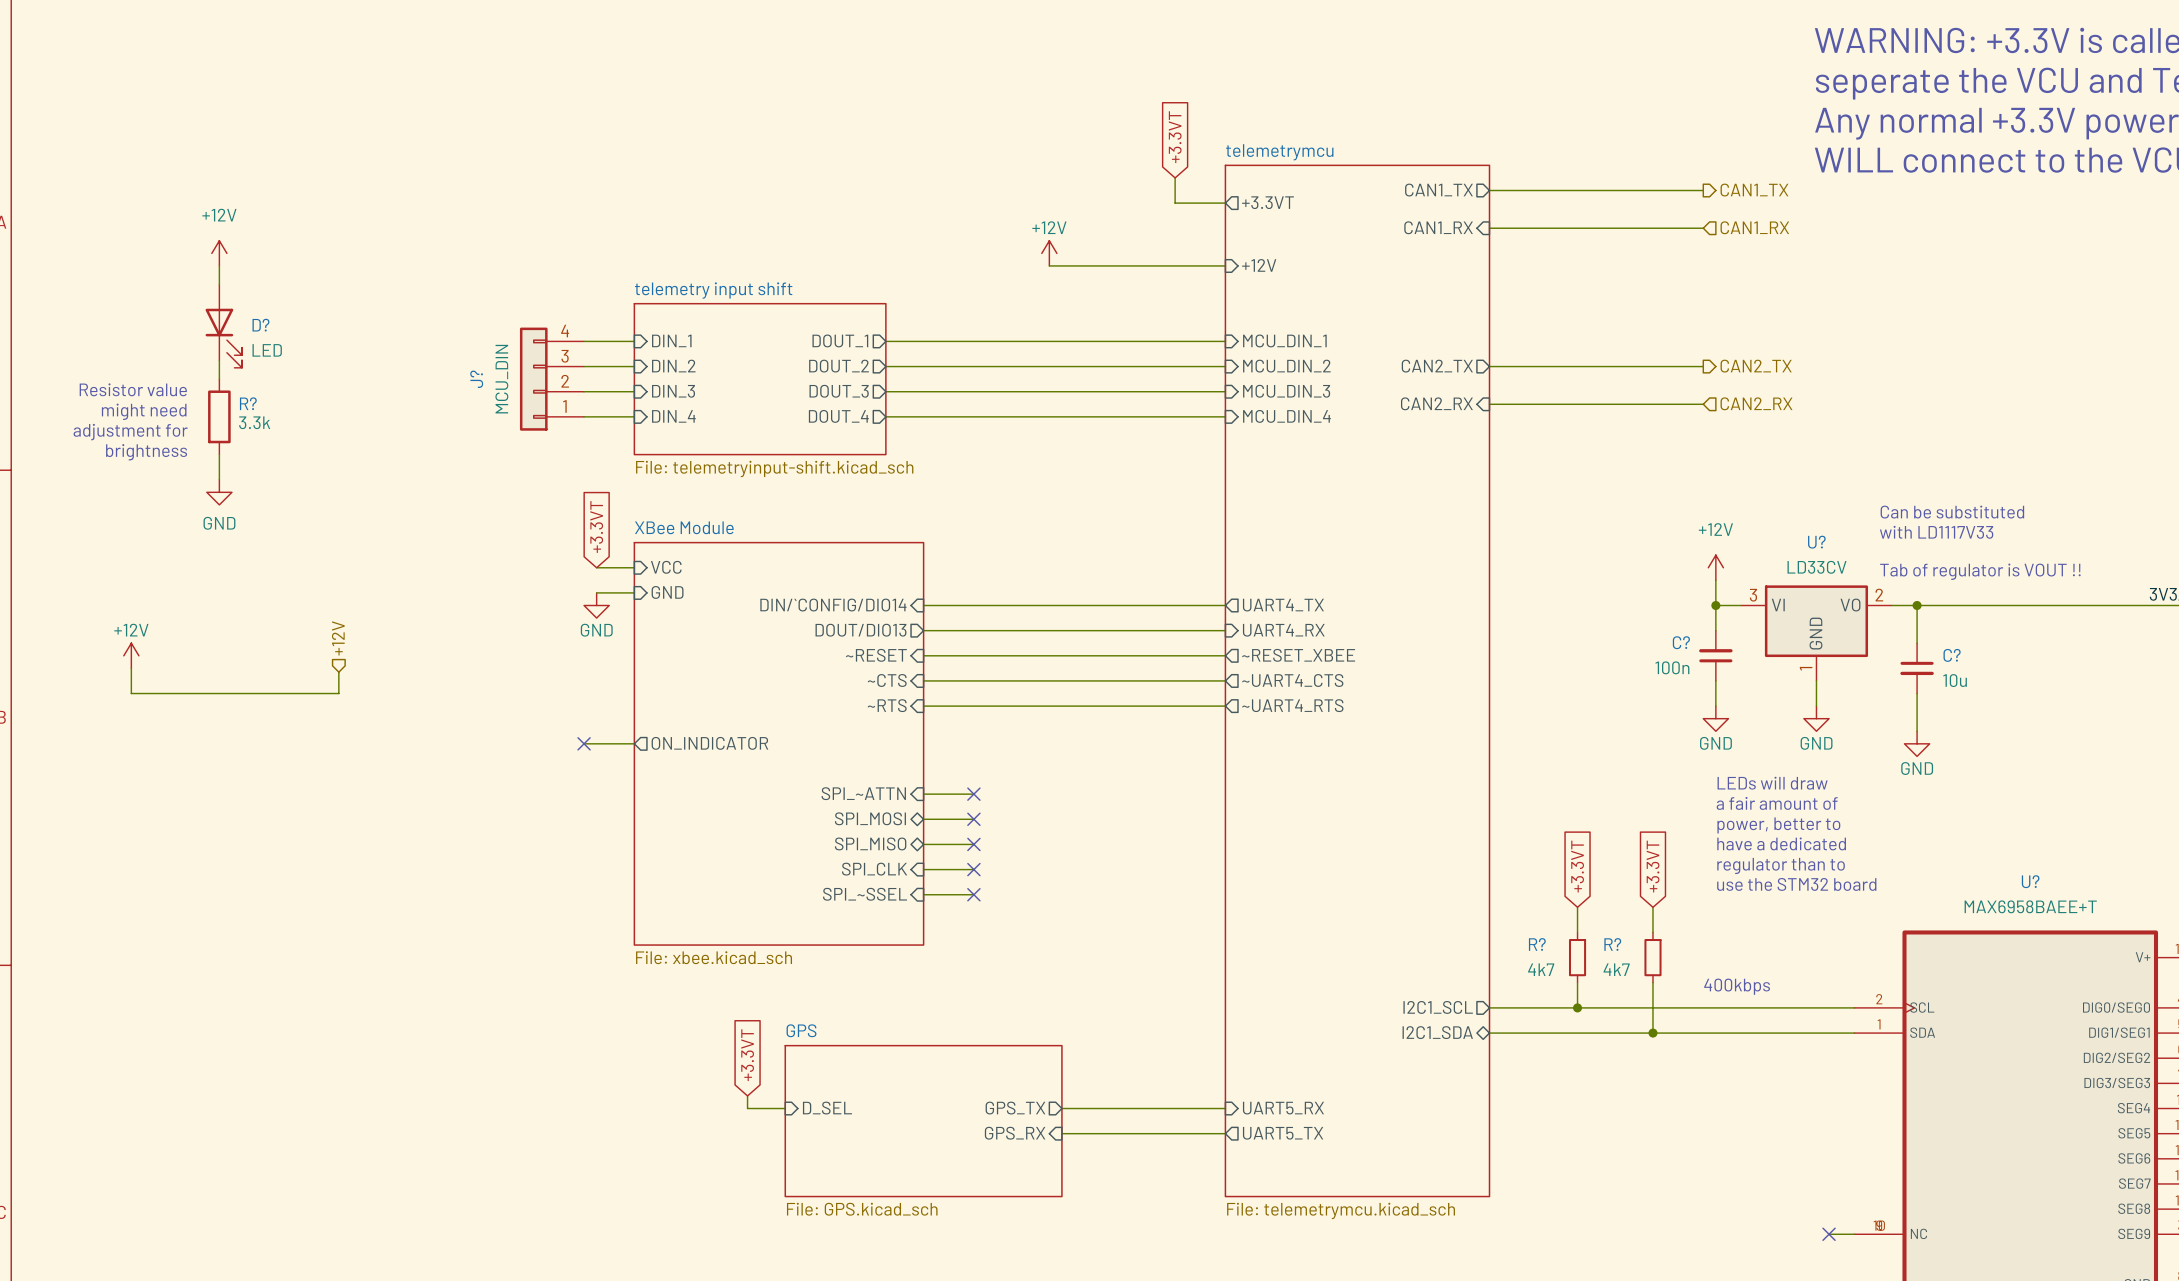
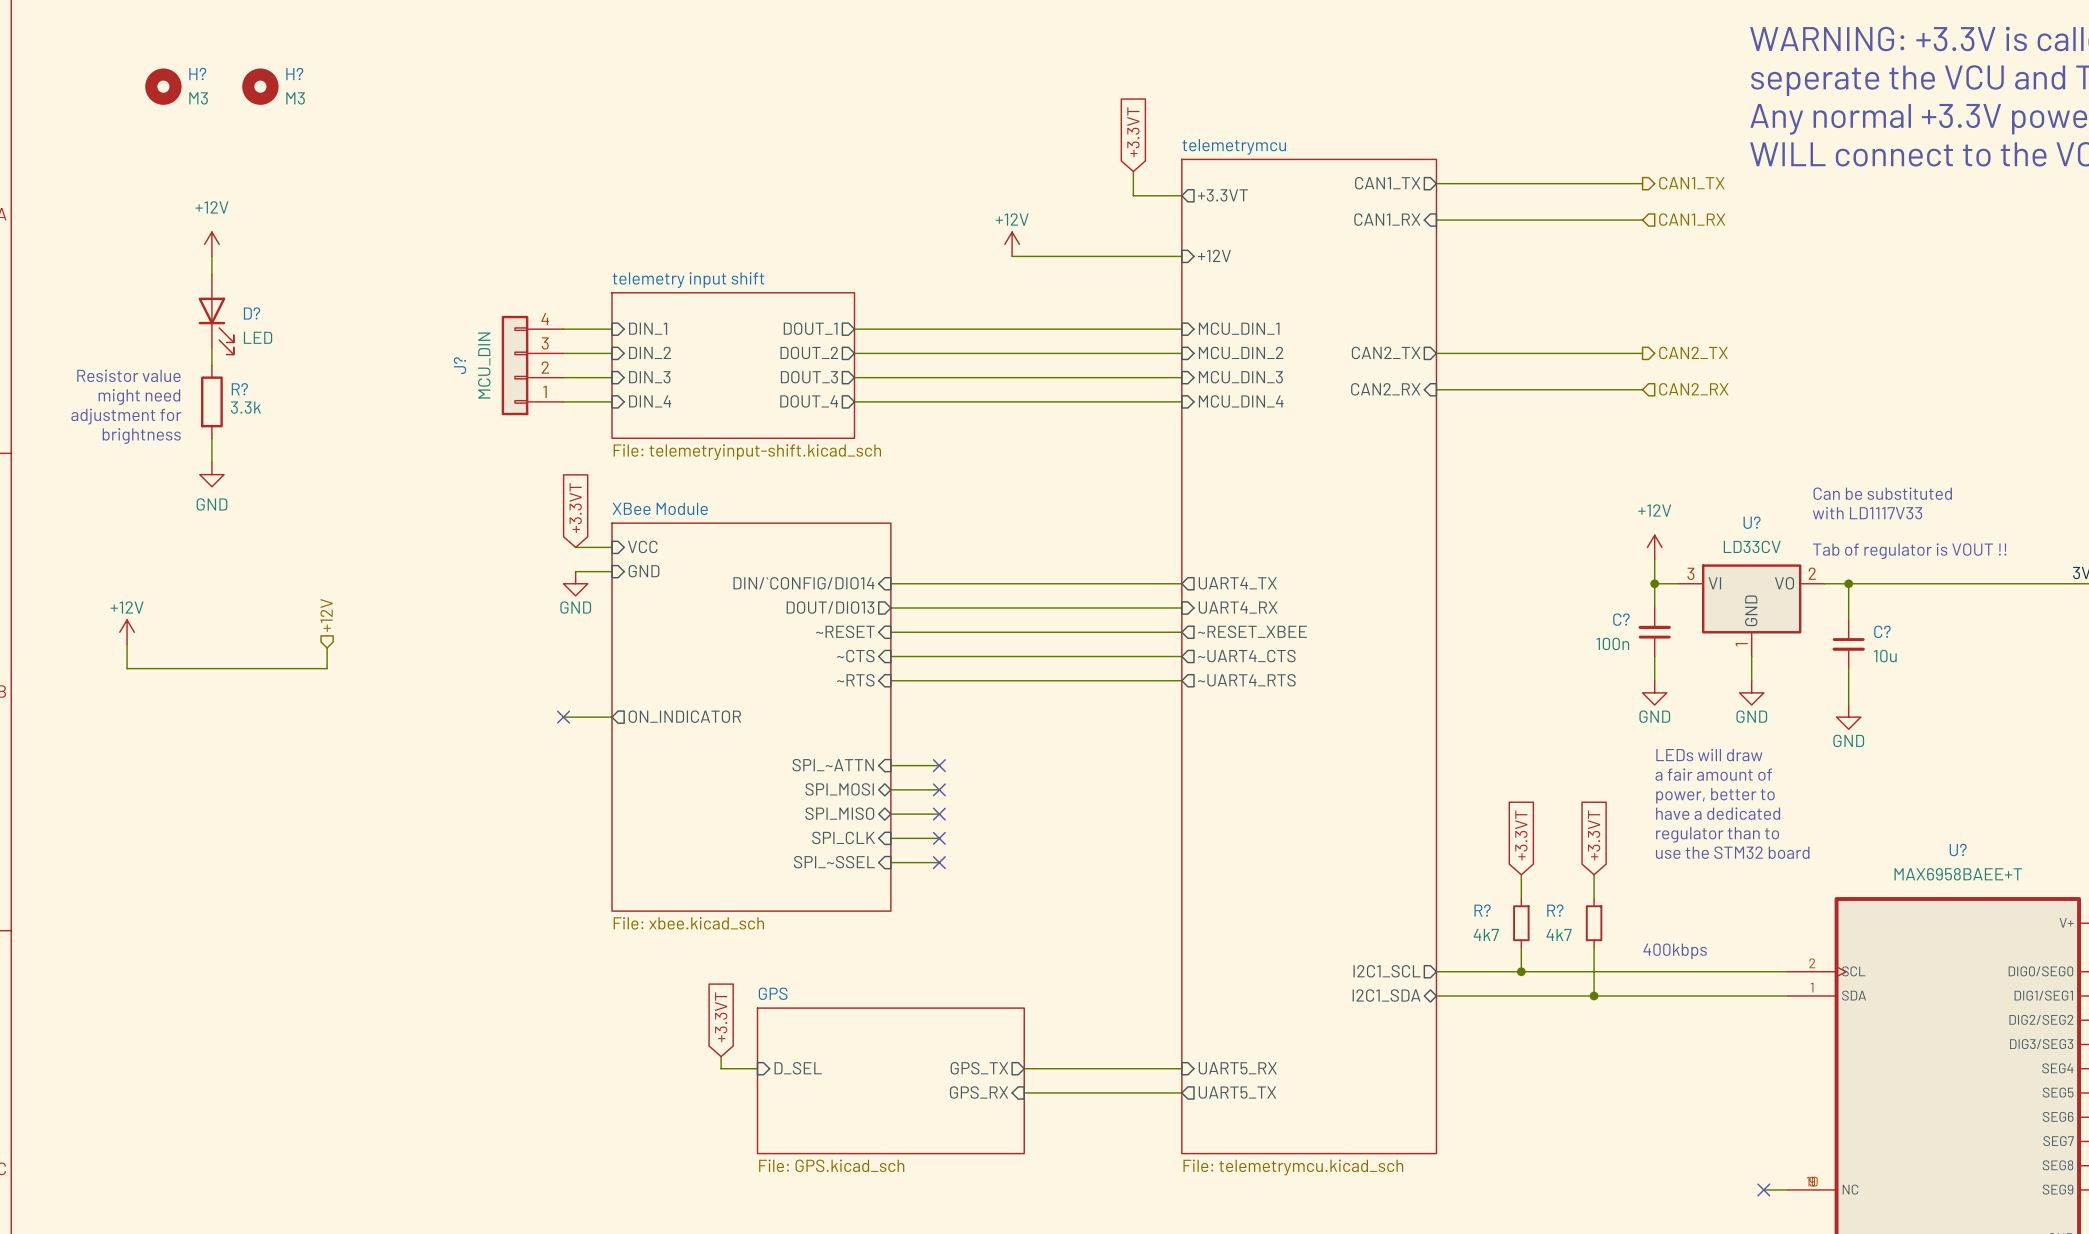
H?: none -> M3 (163, 86)
H?: none -> M3 (260, 86)

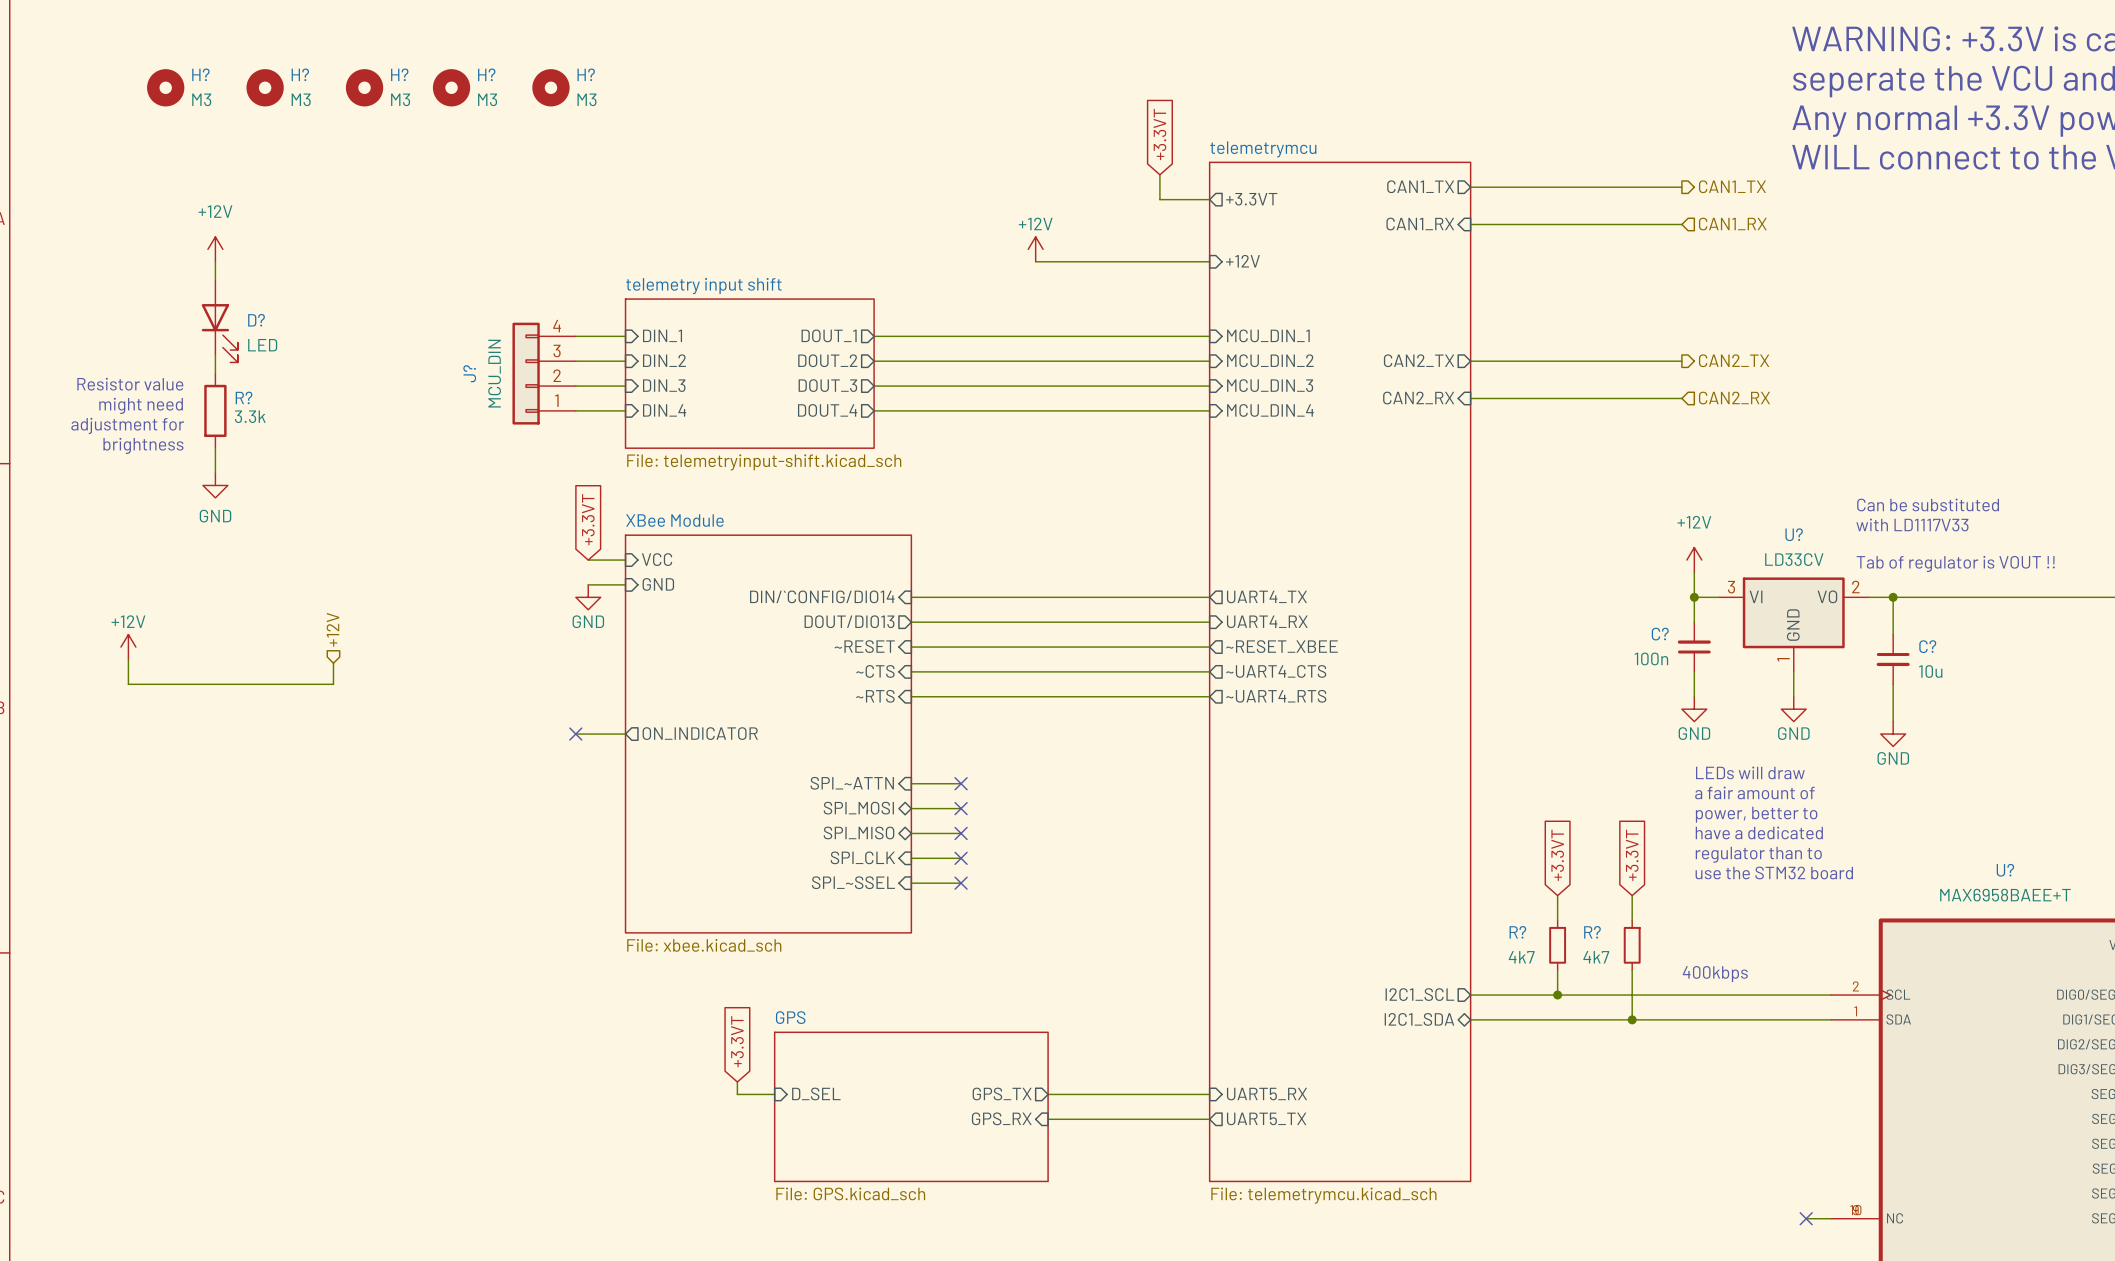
H?: none -> M3 (364, 87)
H?: none -> M3 (451, 87)
H?: none -> M3 (550, 87)

